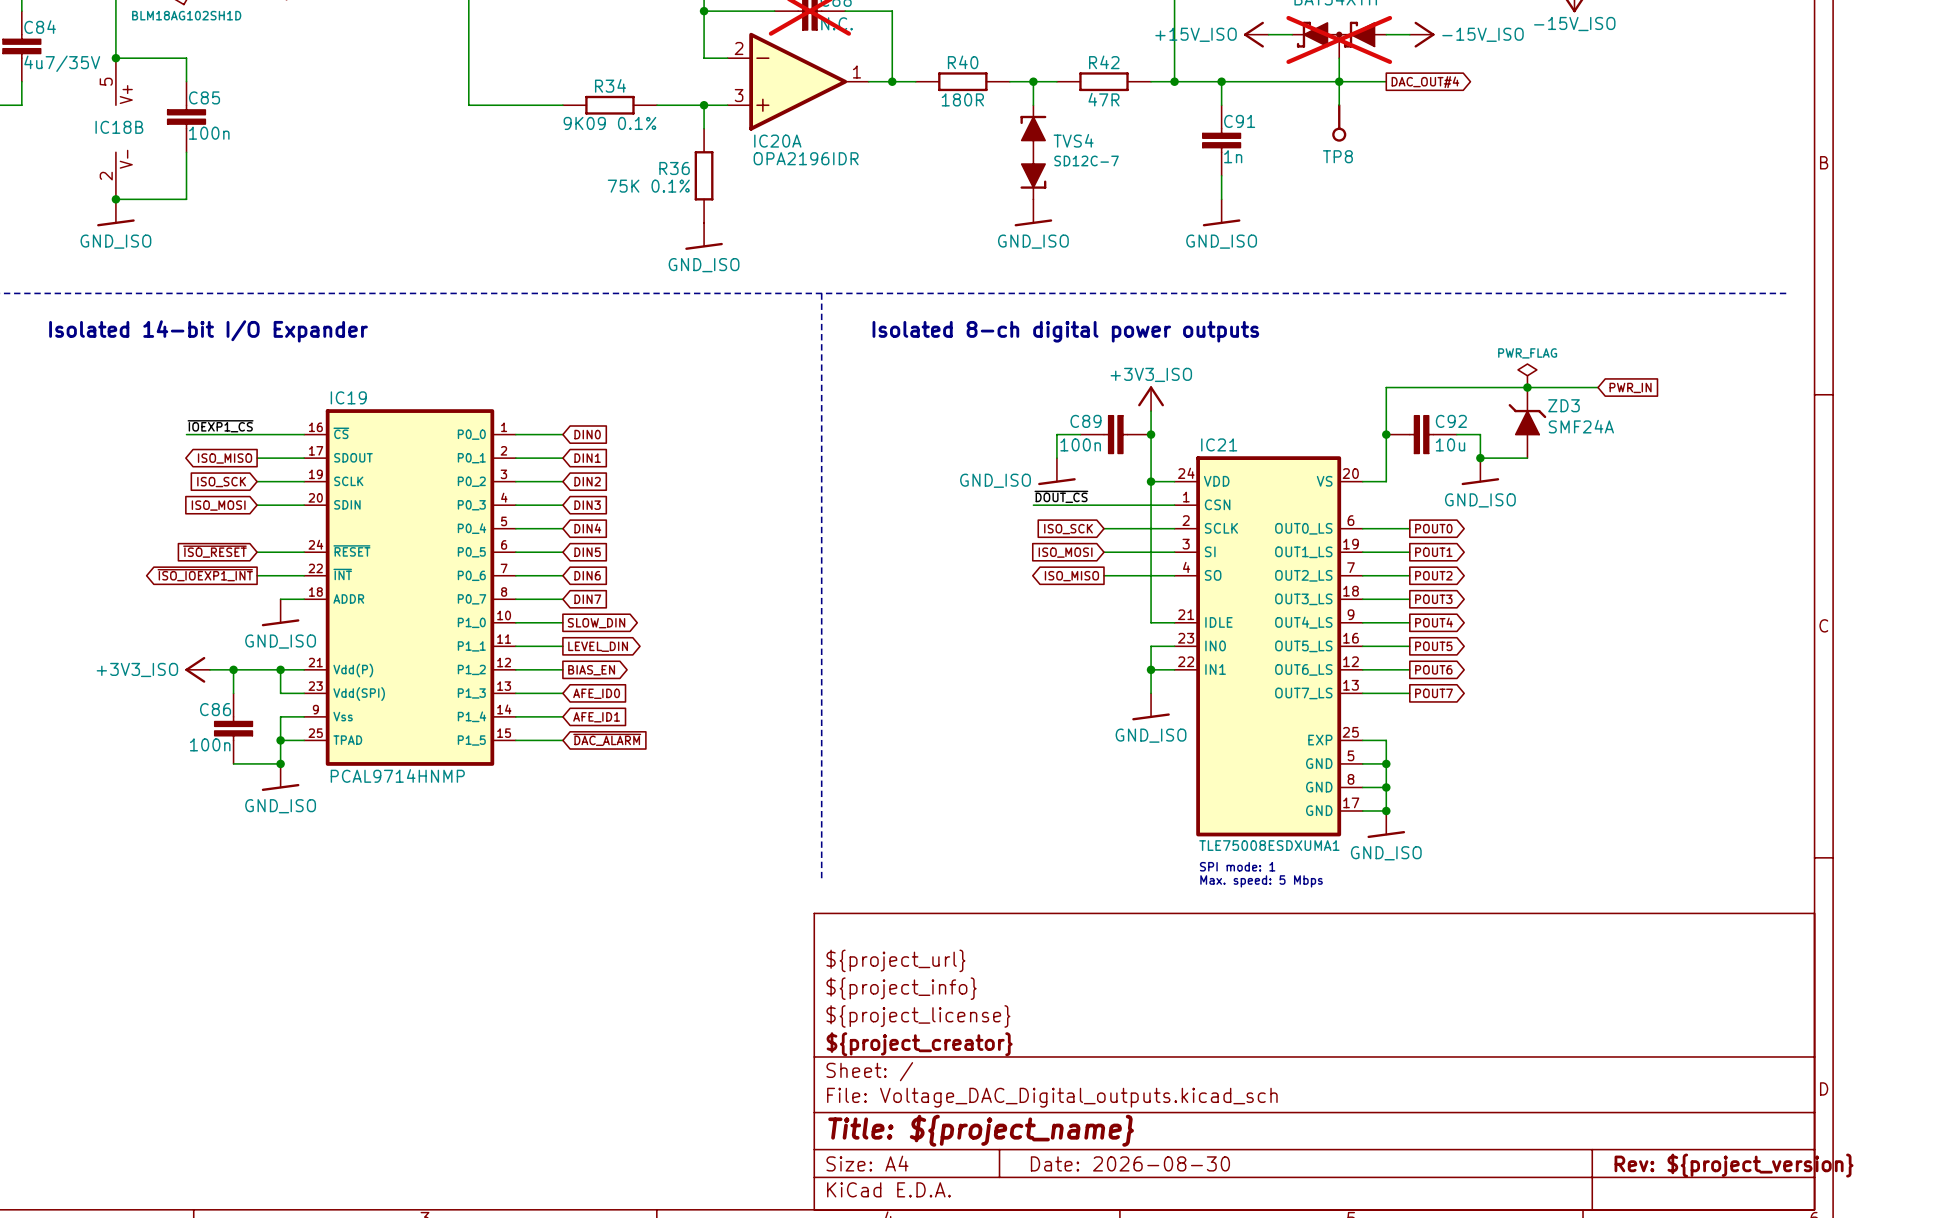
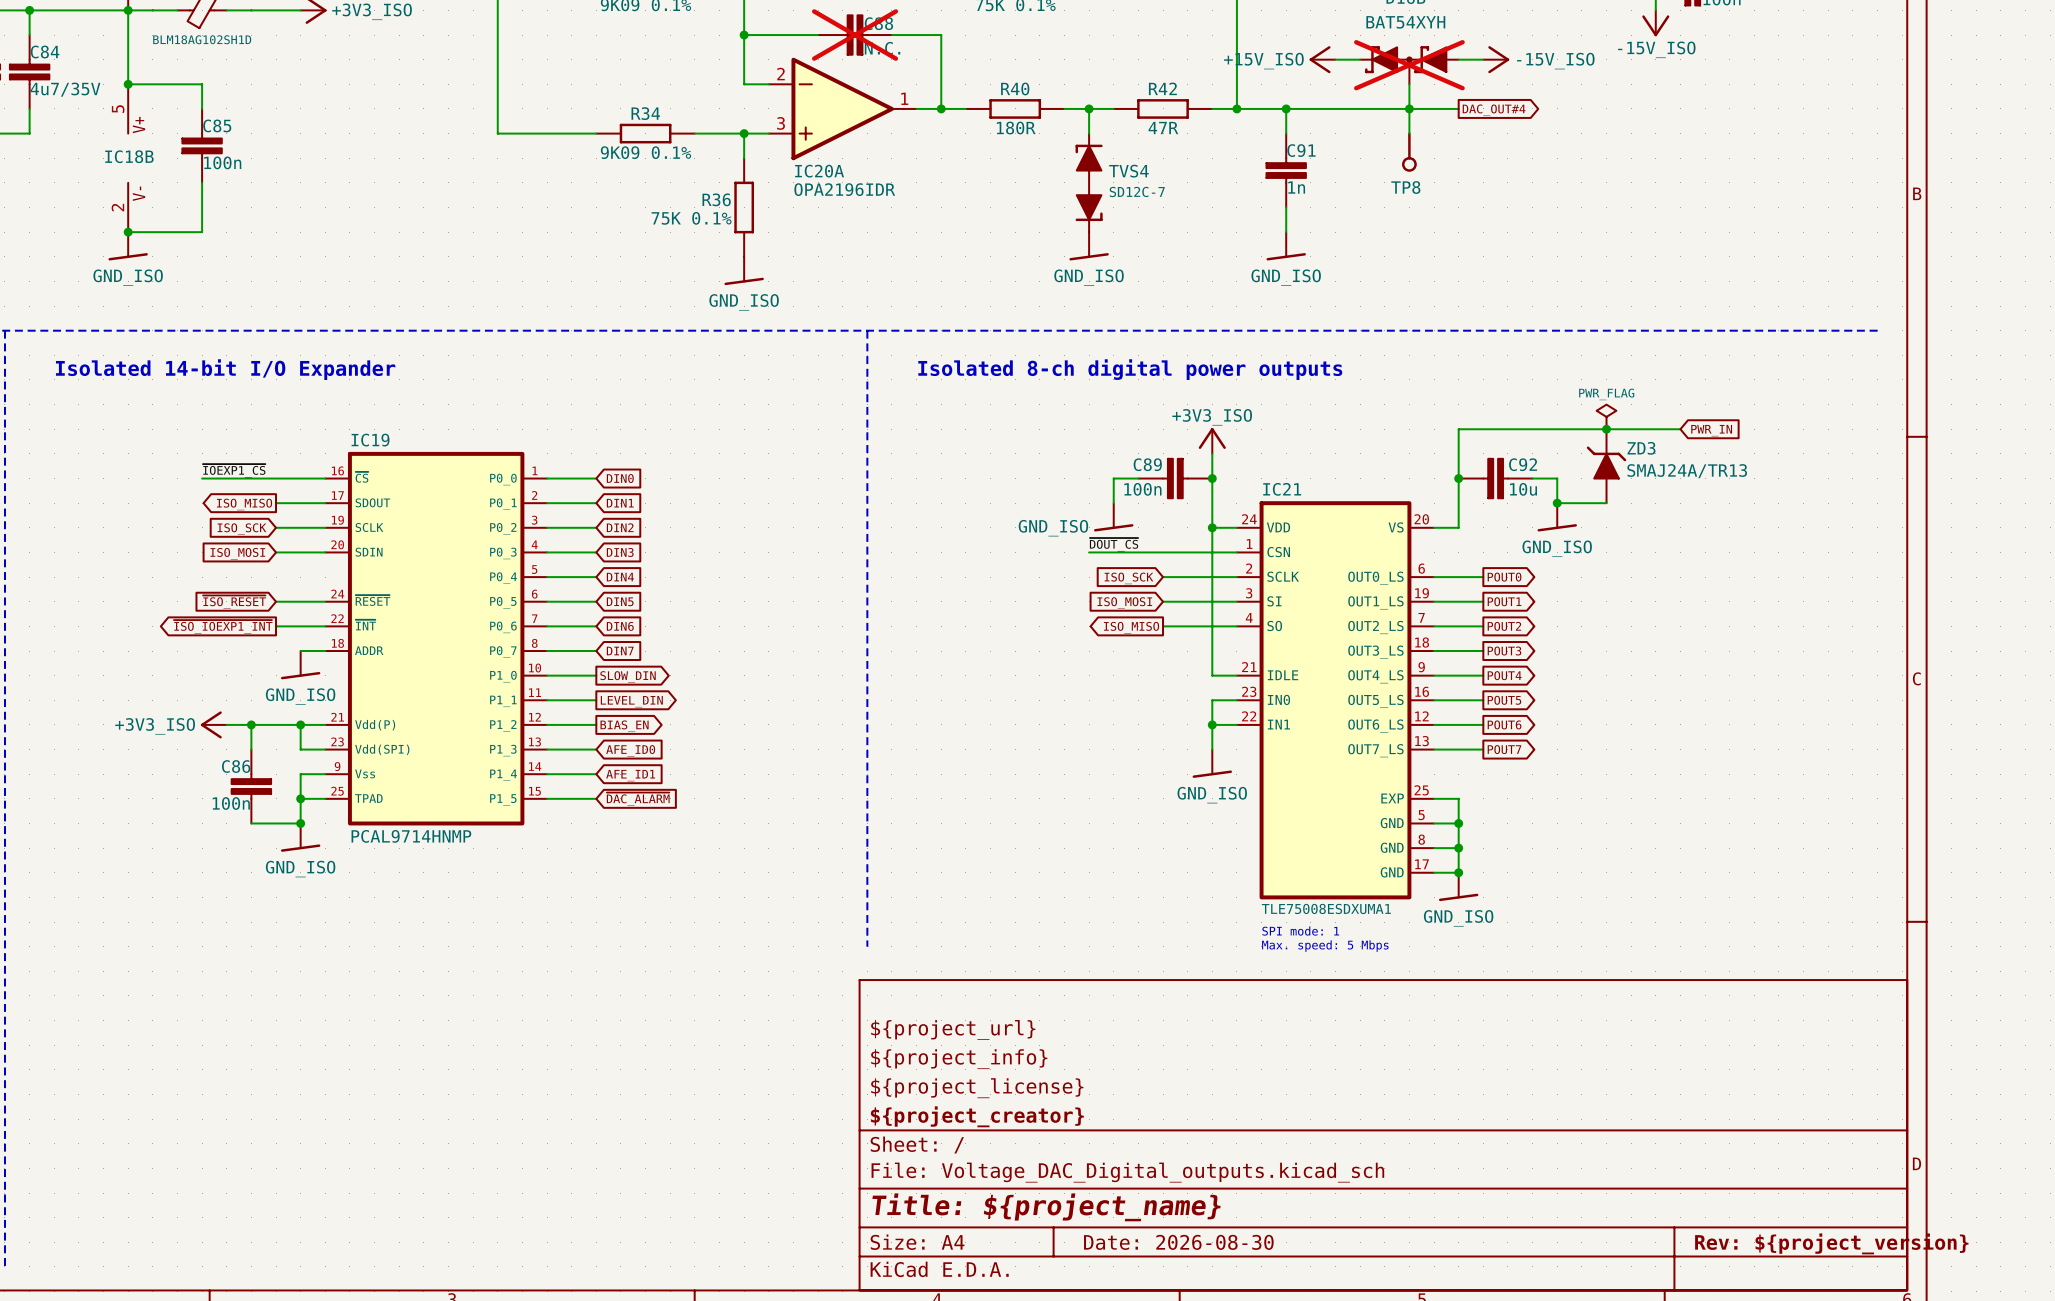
ZD3 value: SMF24A (1581, 426) -> SMAJ24A/TR13 (1687, 471)

